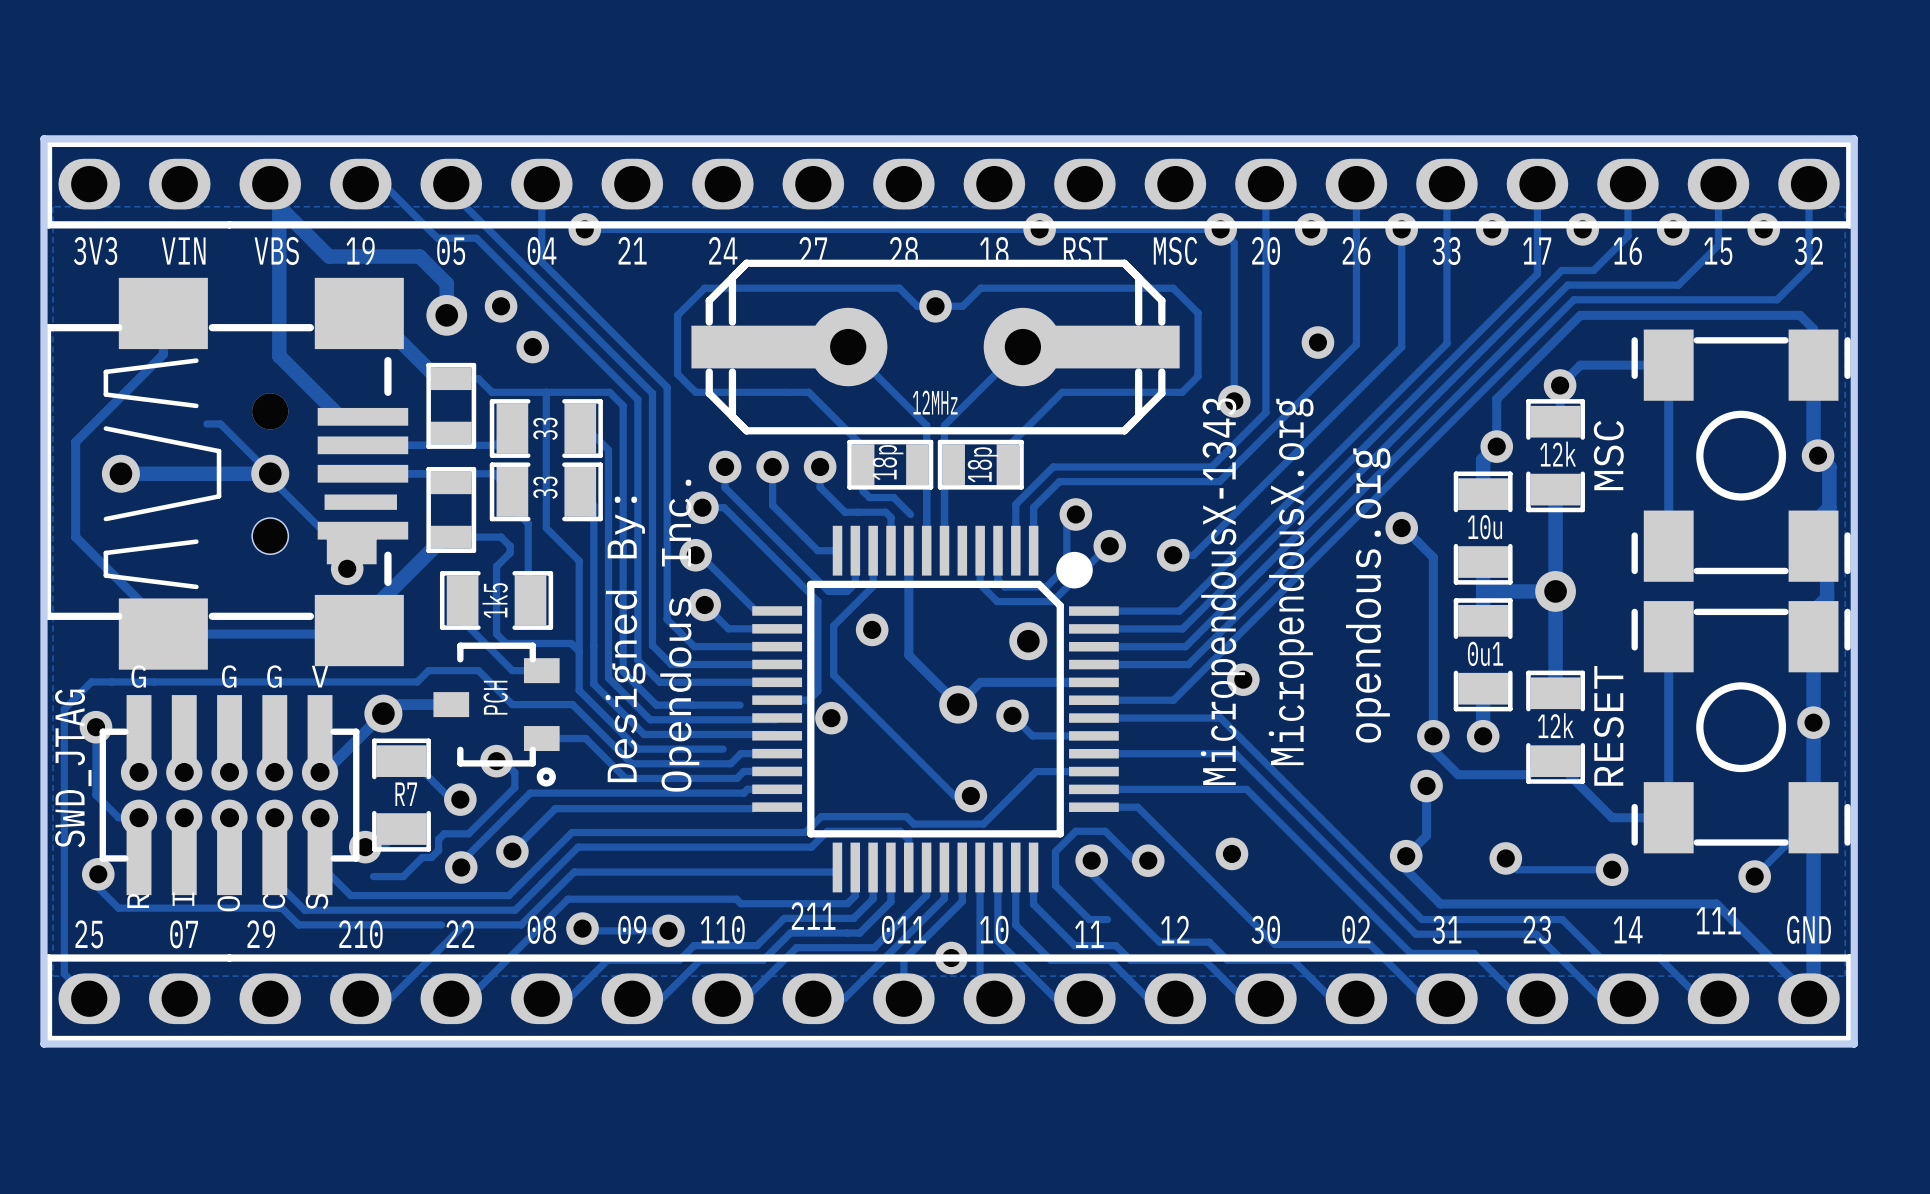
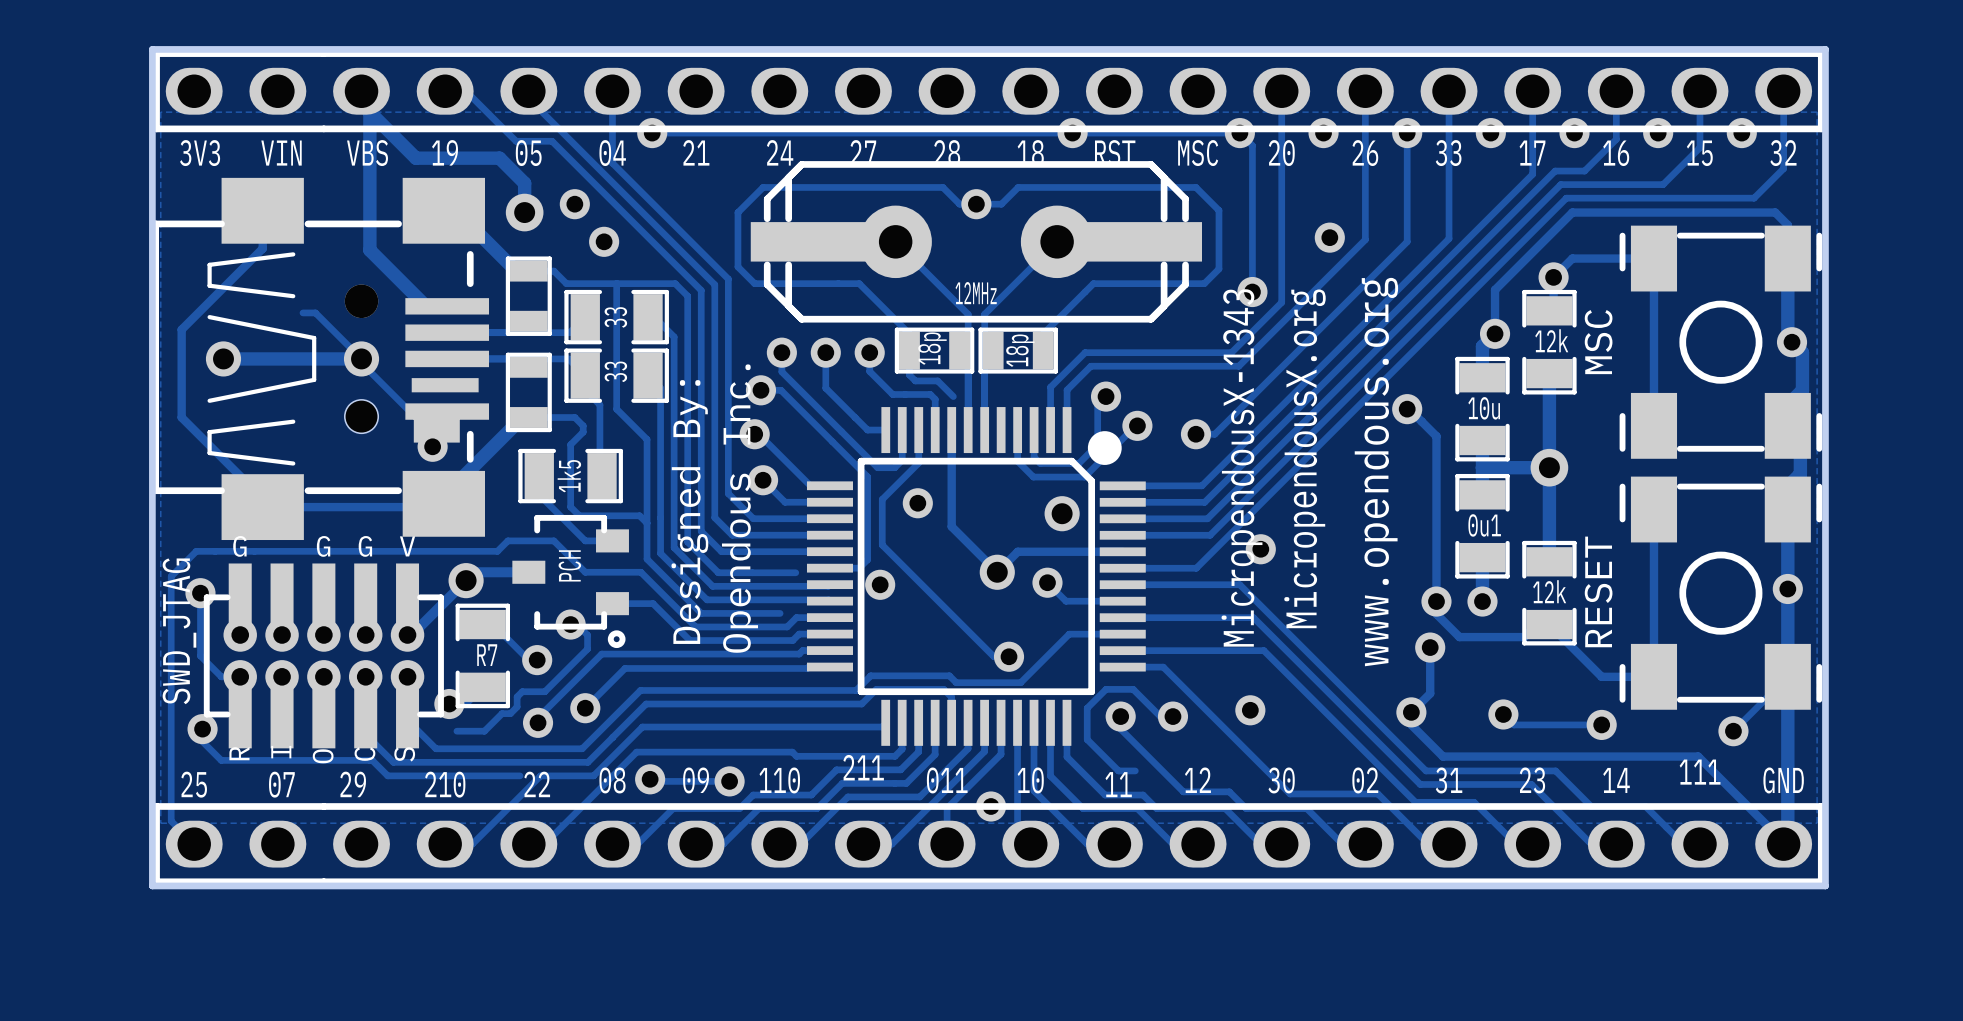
text: opendous.org (1368, 595) -> www.opendous.org (1376, 472)

